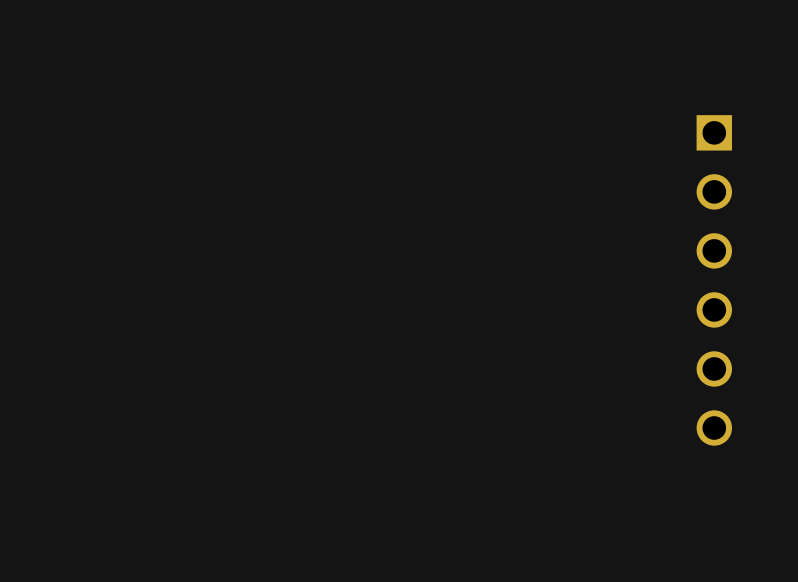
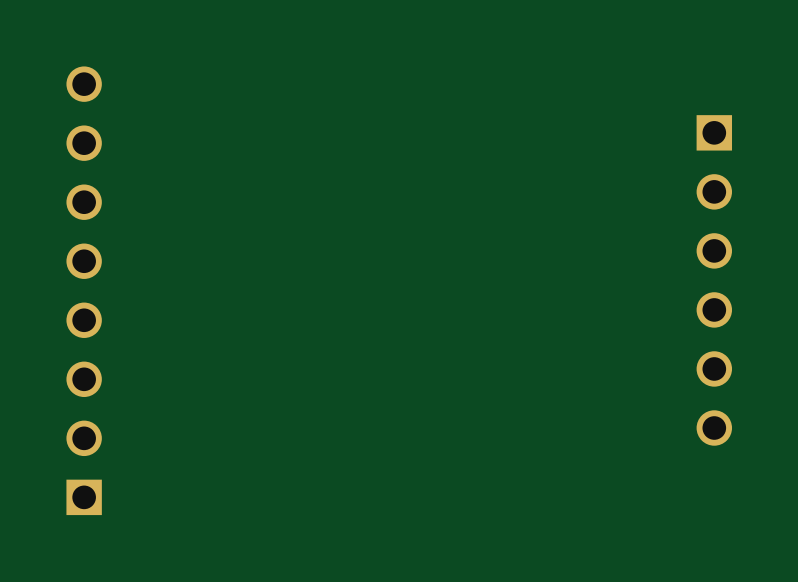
part: none -> (84, 290)

